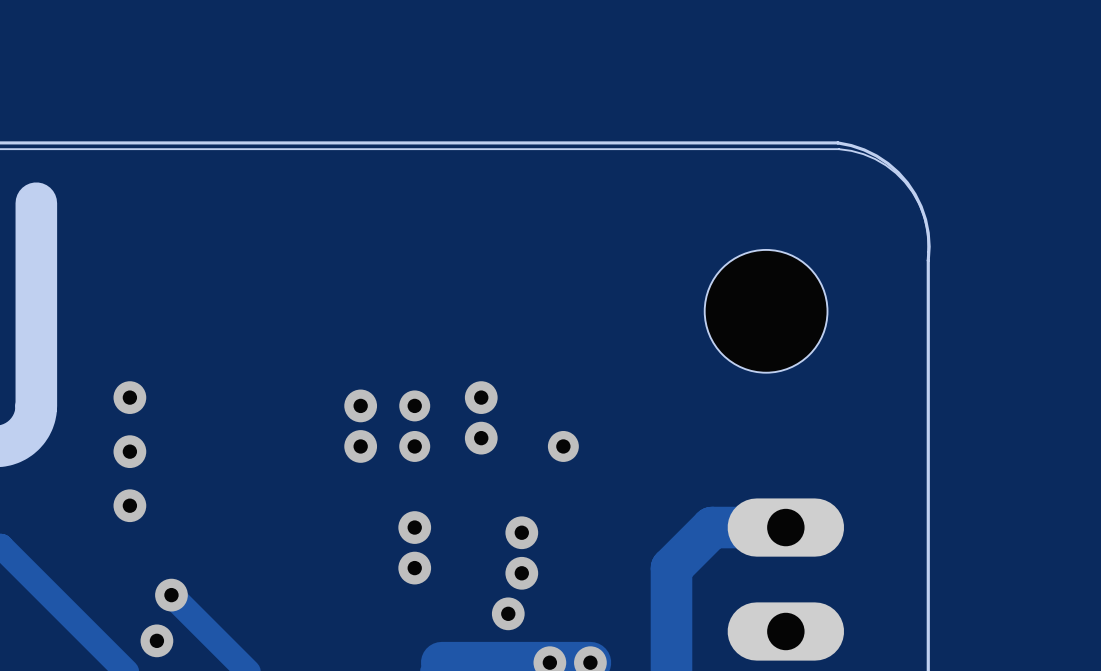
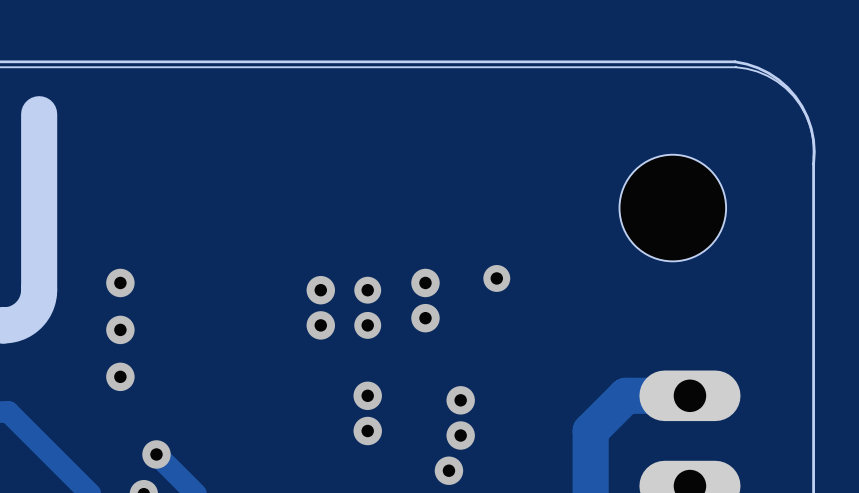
via position: (563, 446) -> (496, 278)

